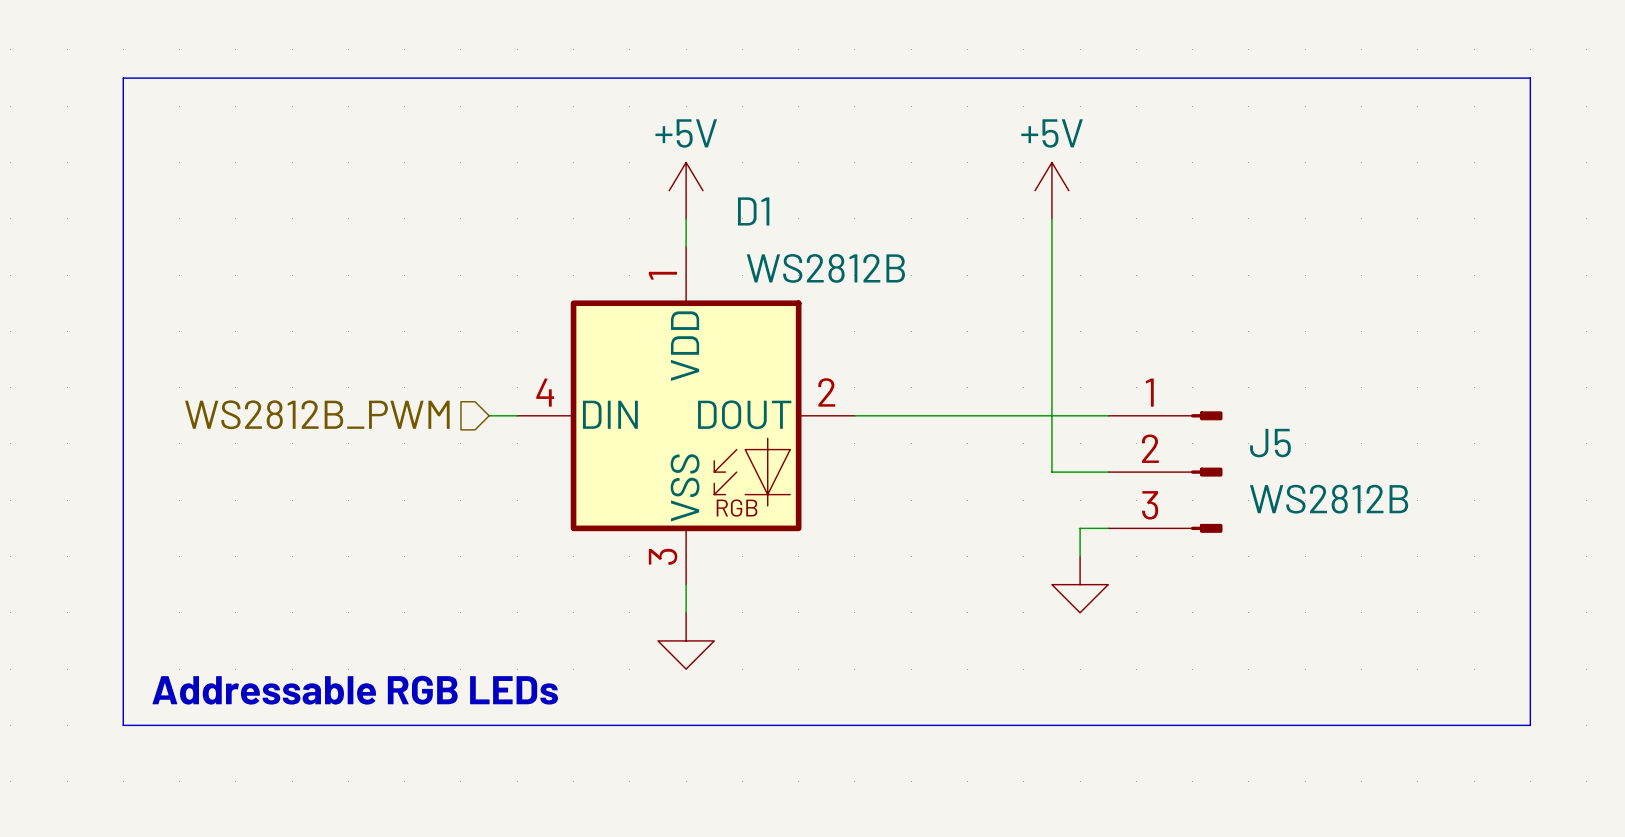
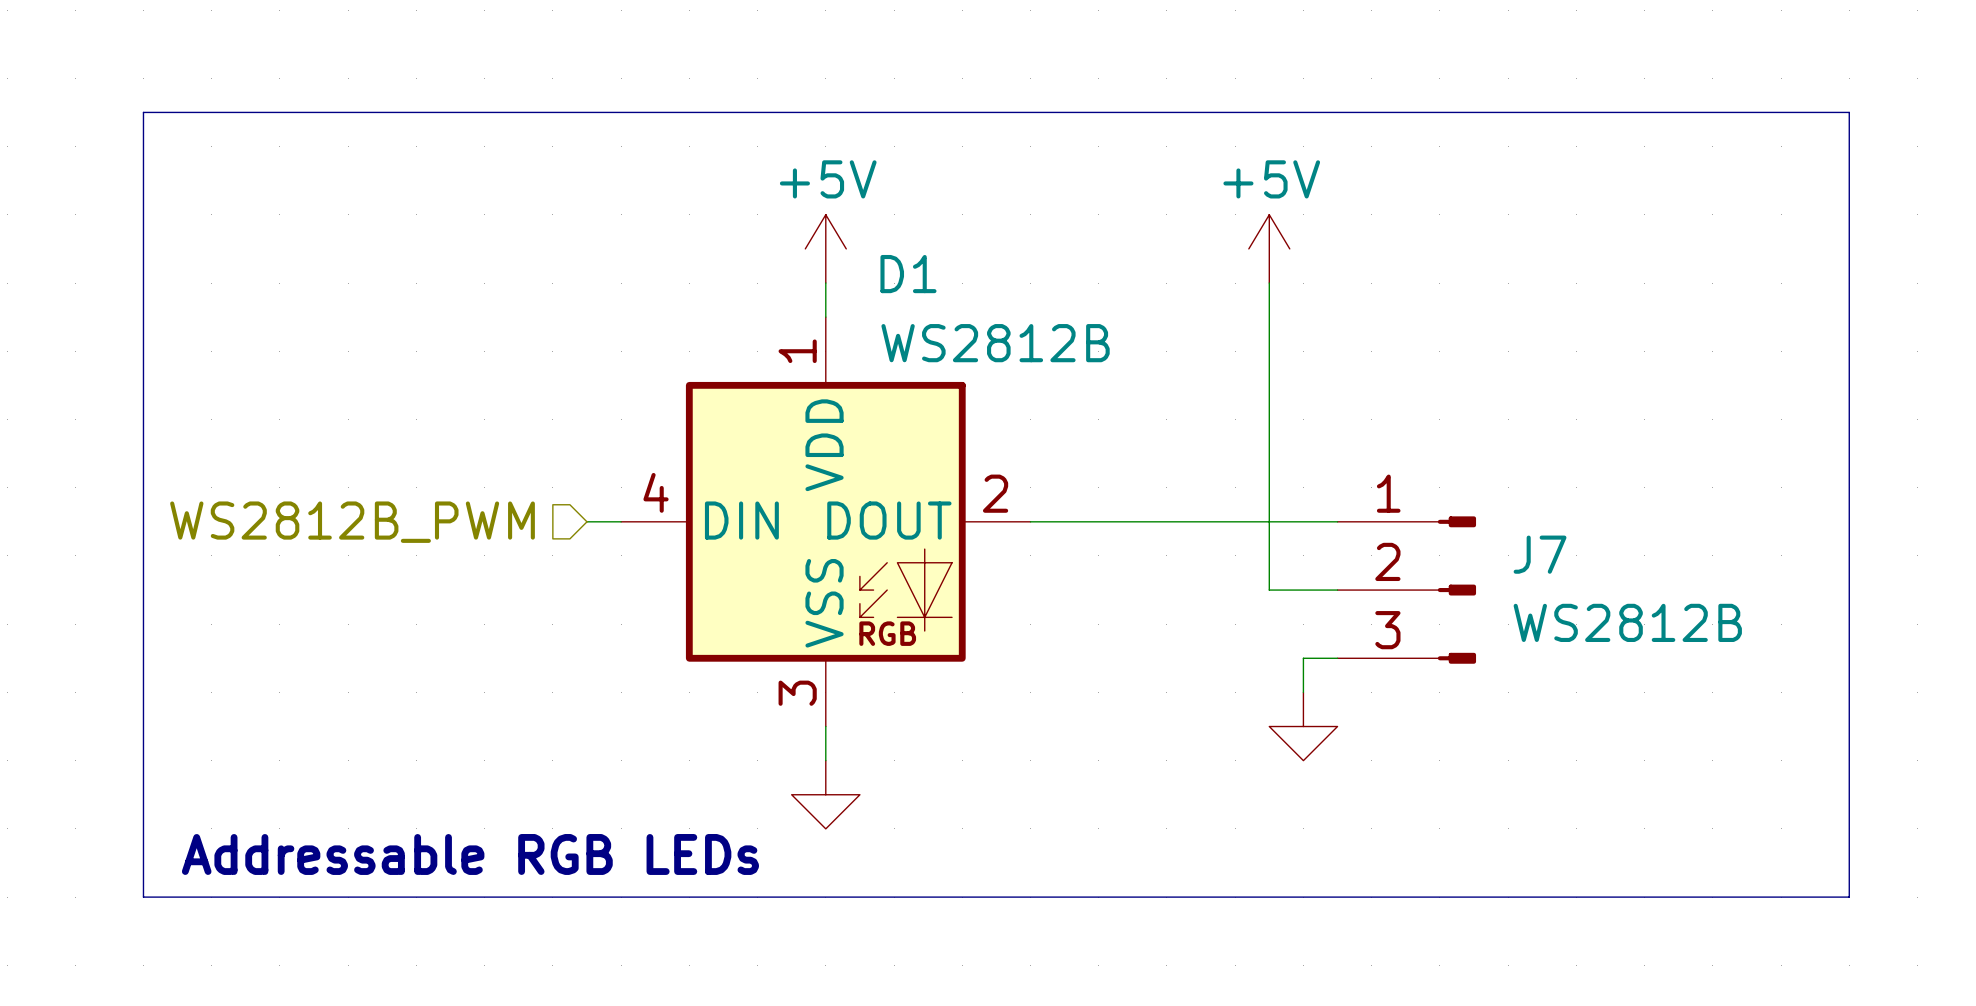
J5 name: J5 (1270, 443) -> J7 (1540, 554)

